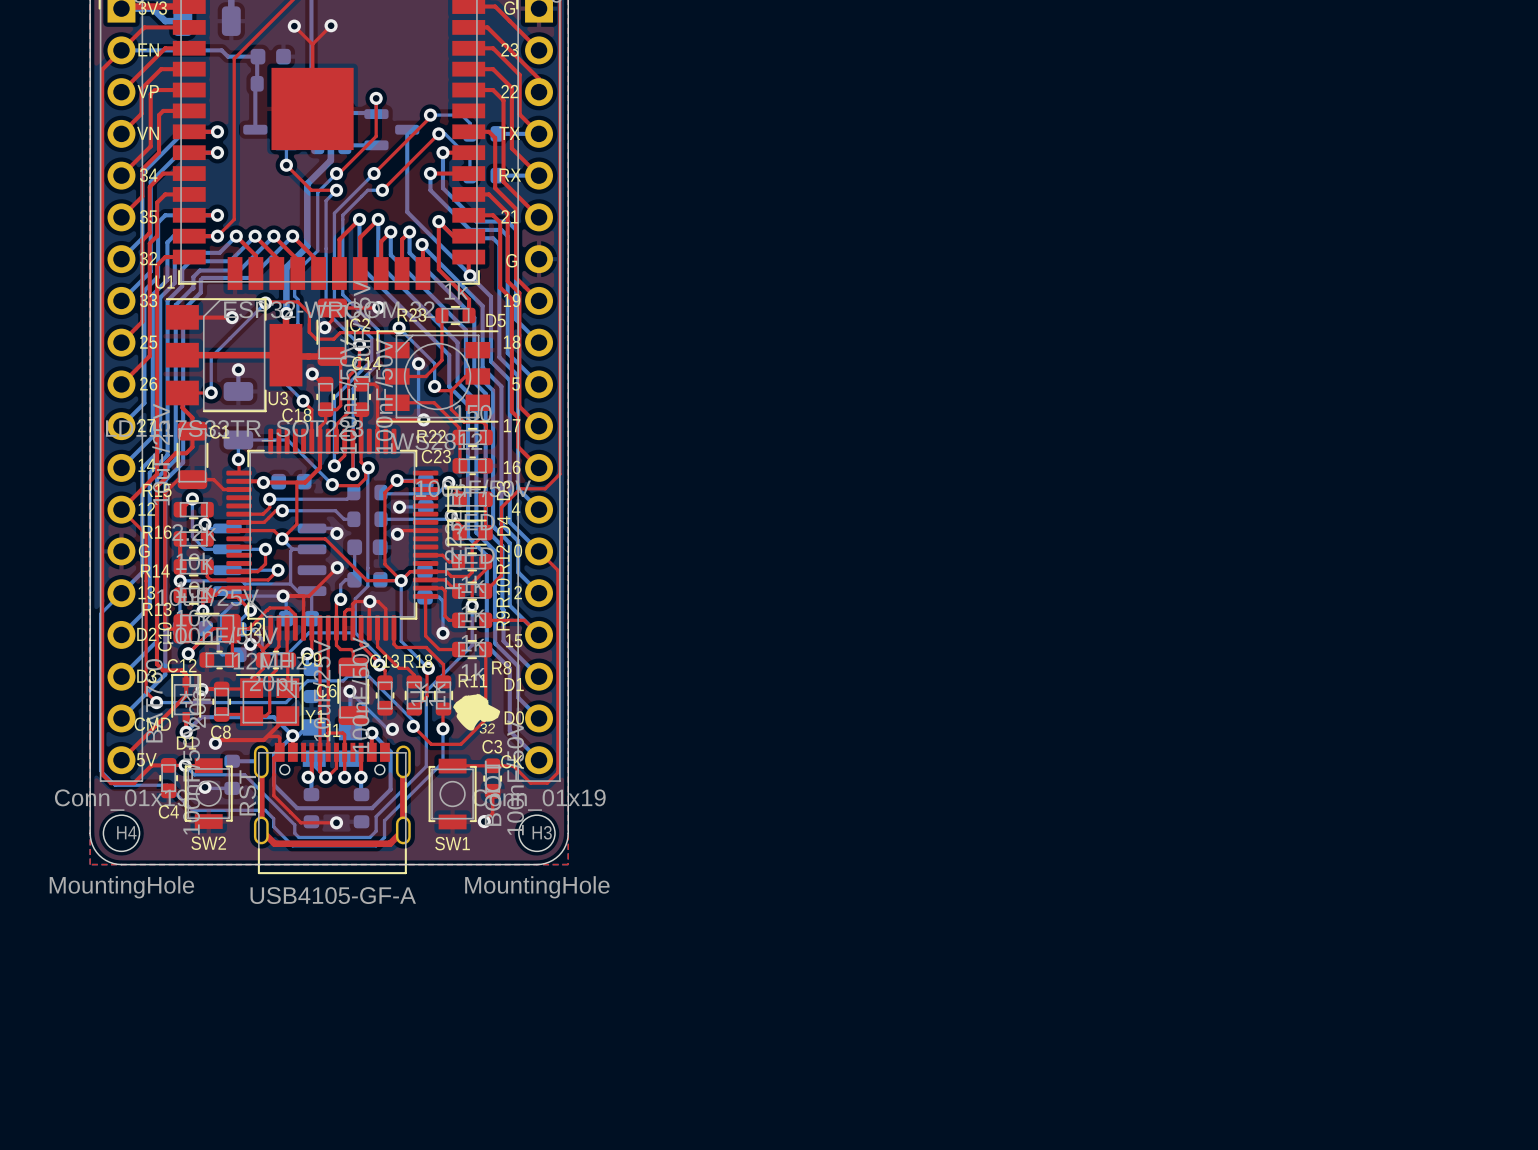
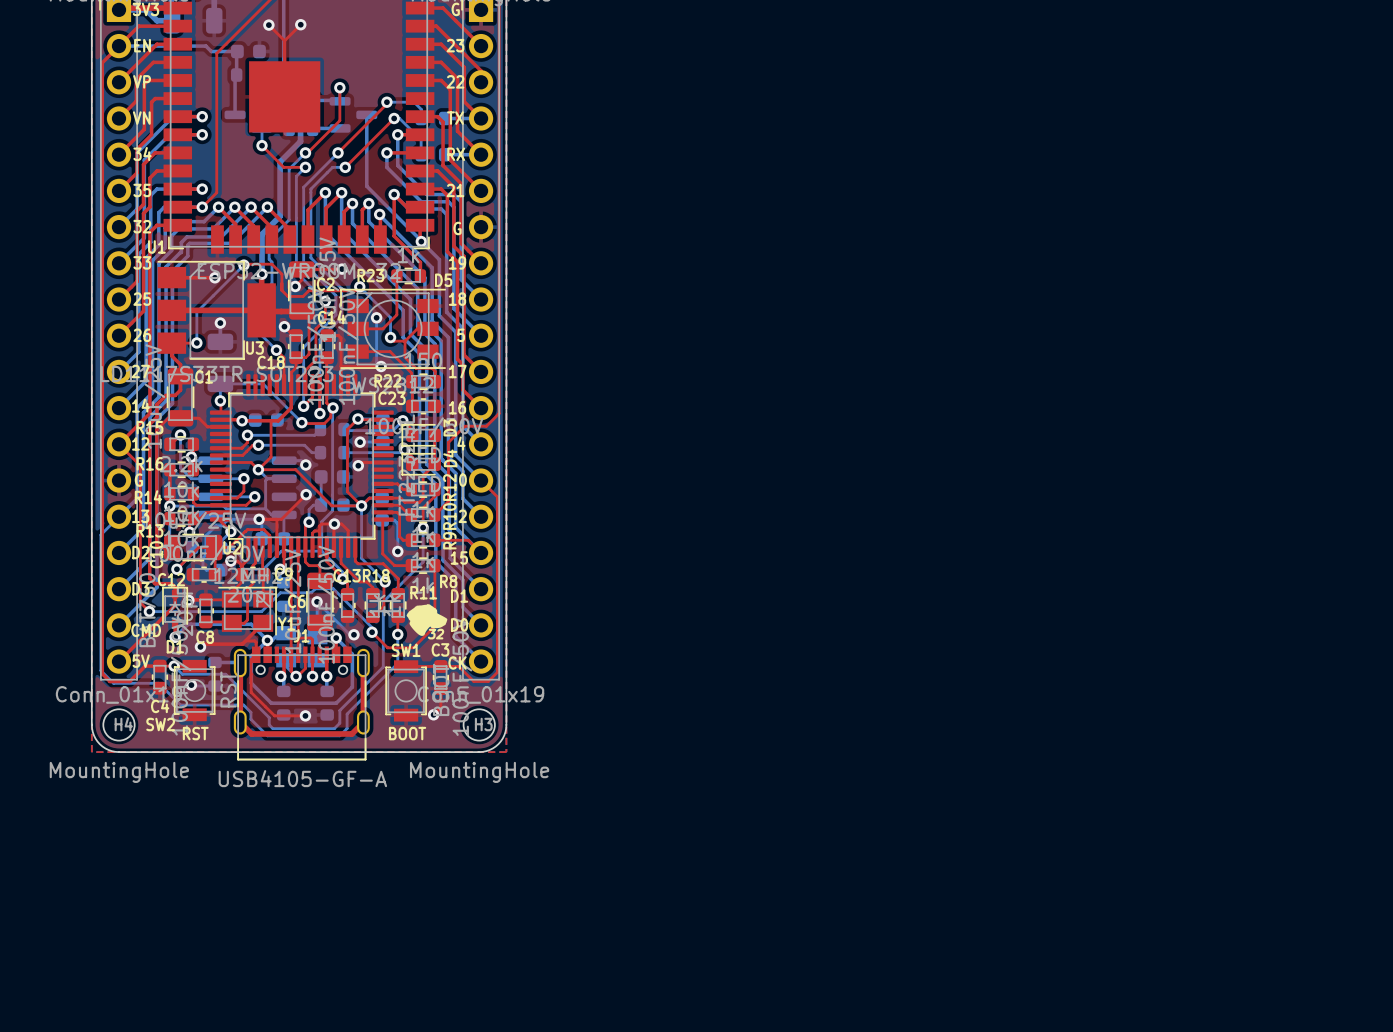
SW2 name position: SW2 (208, 843) -> SW2 (160, 724)
text: none -> RST (195, 733)
SW1 name position: SW1 (452, 843) -> SW1 (406, 650)
text: none -> BOOT (407, 733)

